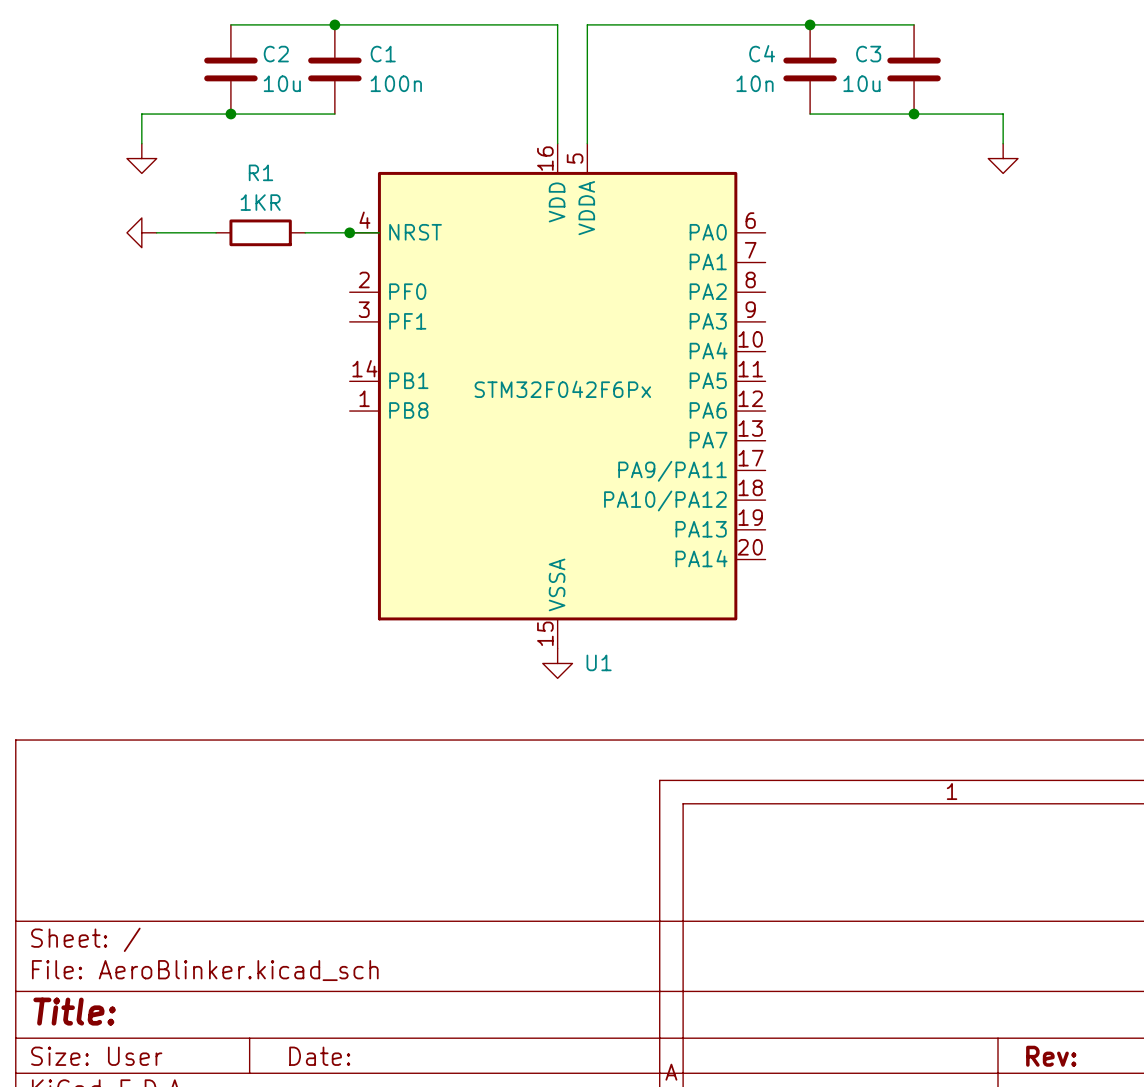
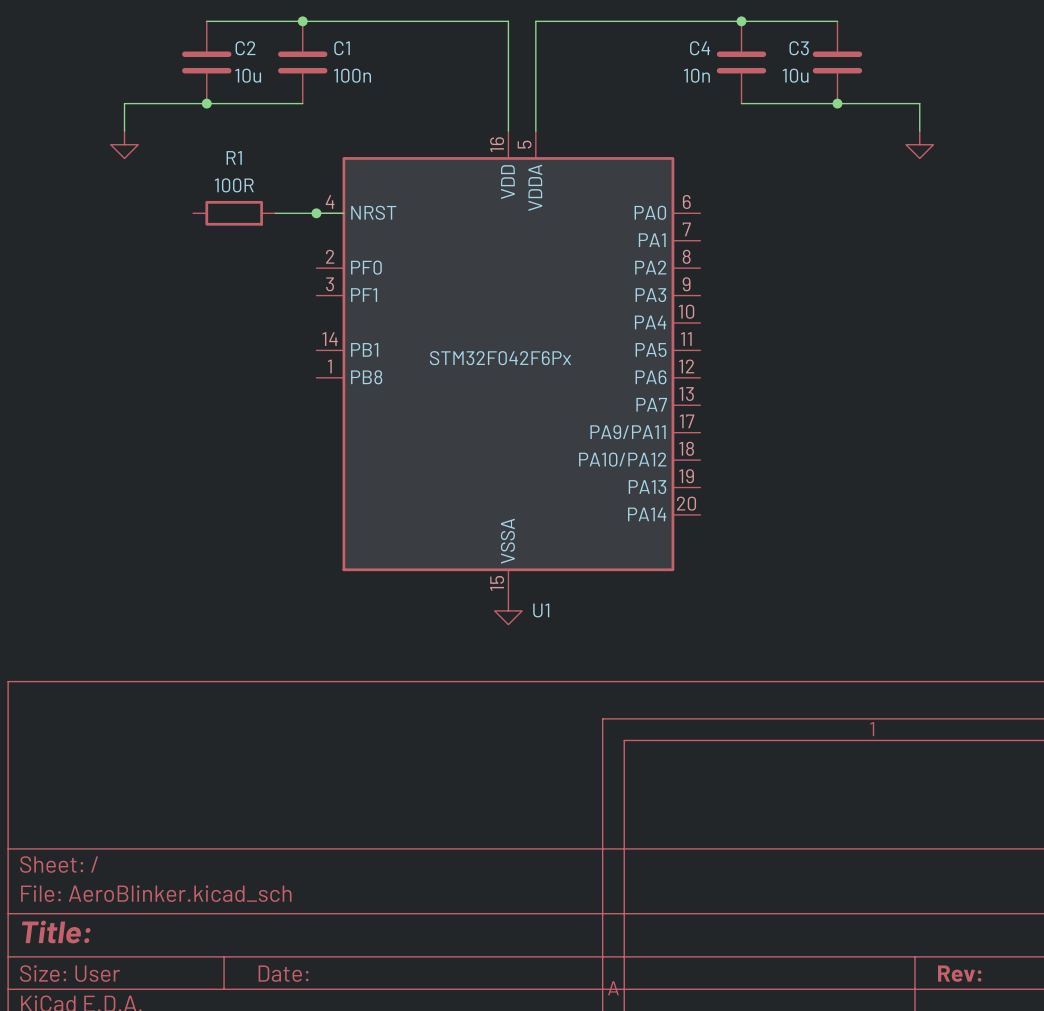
R1 value: 1KR (260, 202) -> 100R (234, 185)
power symbol: (141, 232) -> none
wire: (156, 232) (216, 232) -> none

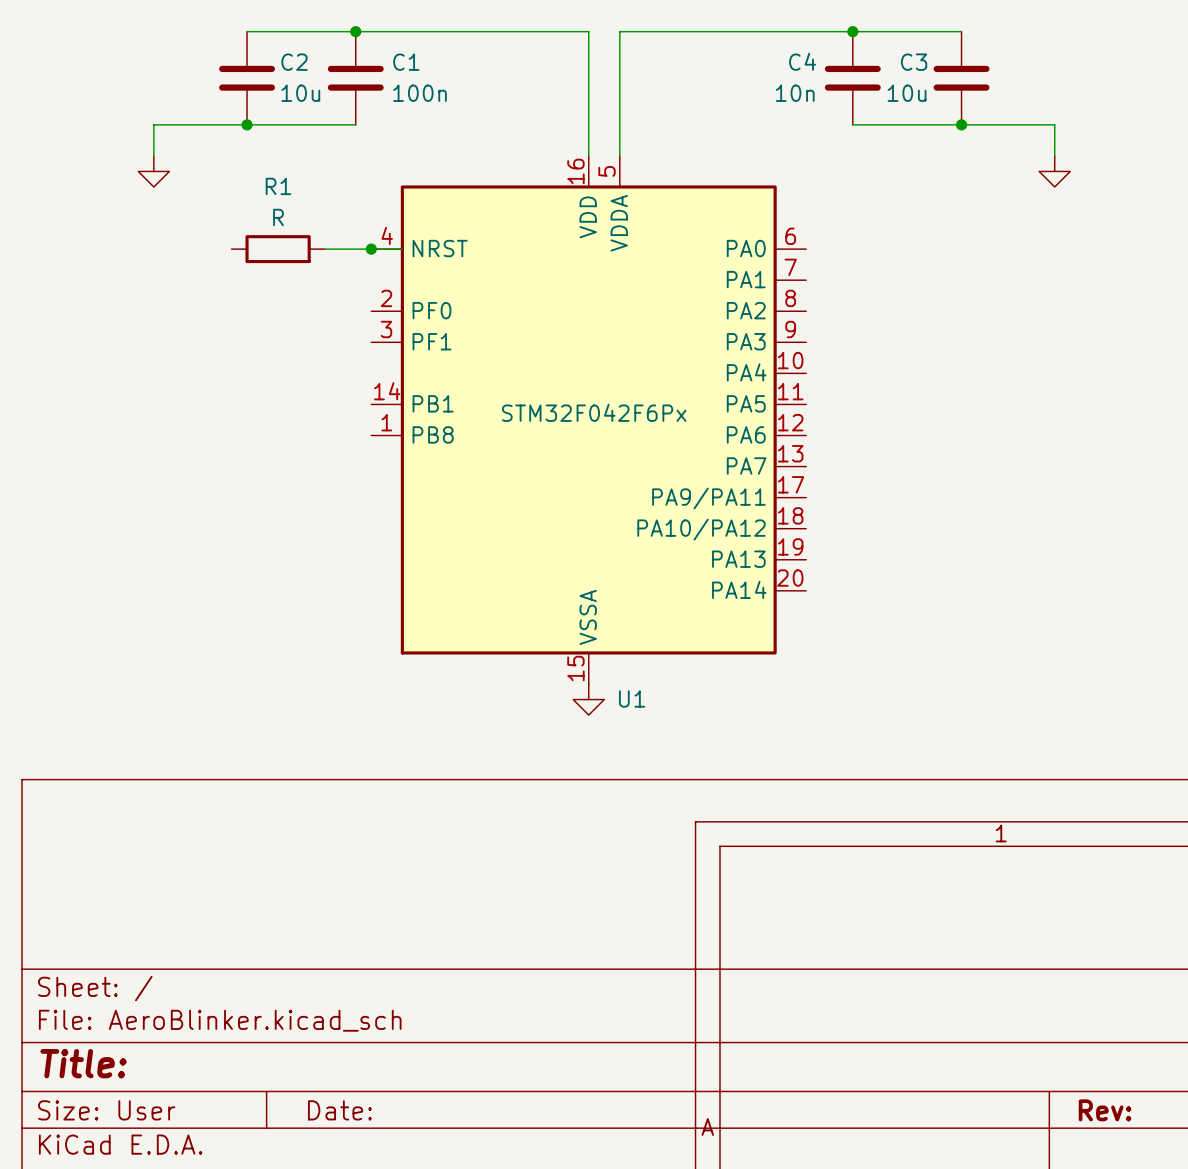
R1 value: 100R (234, 185) -> R (278, 217)

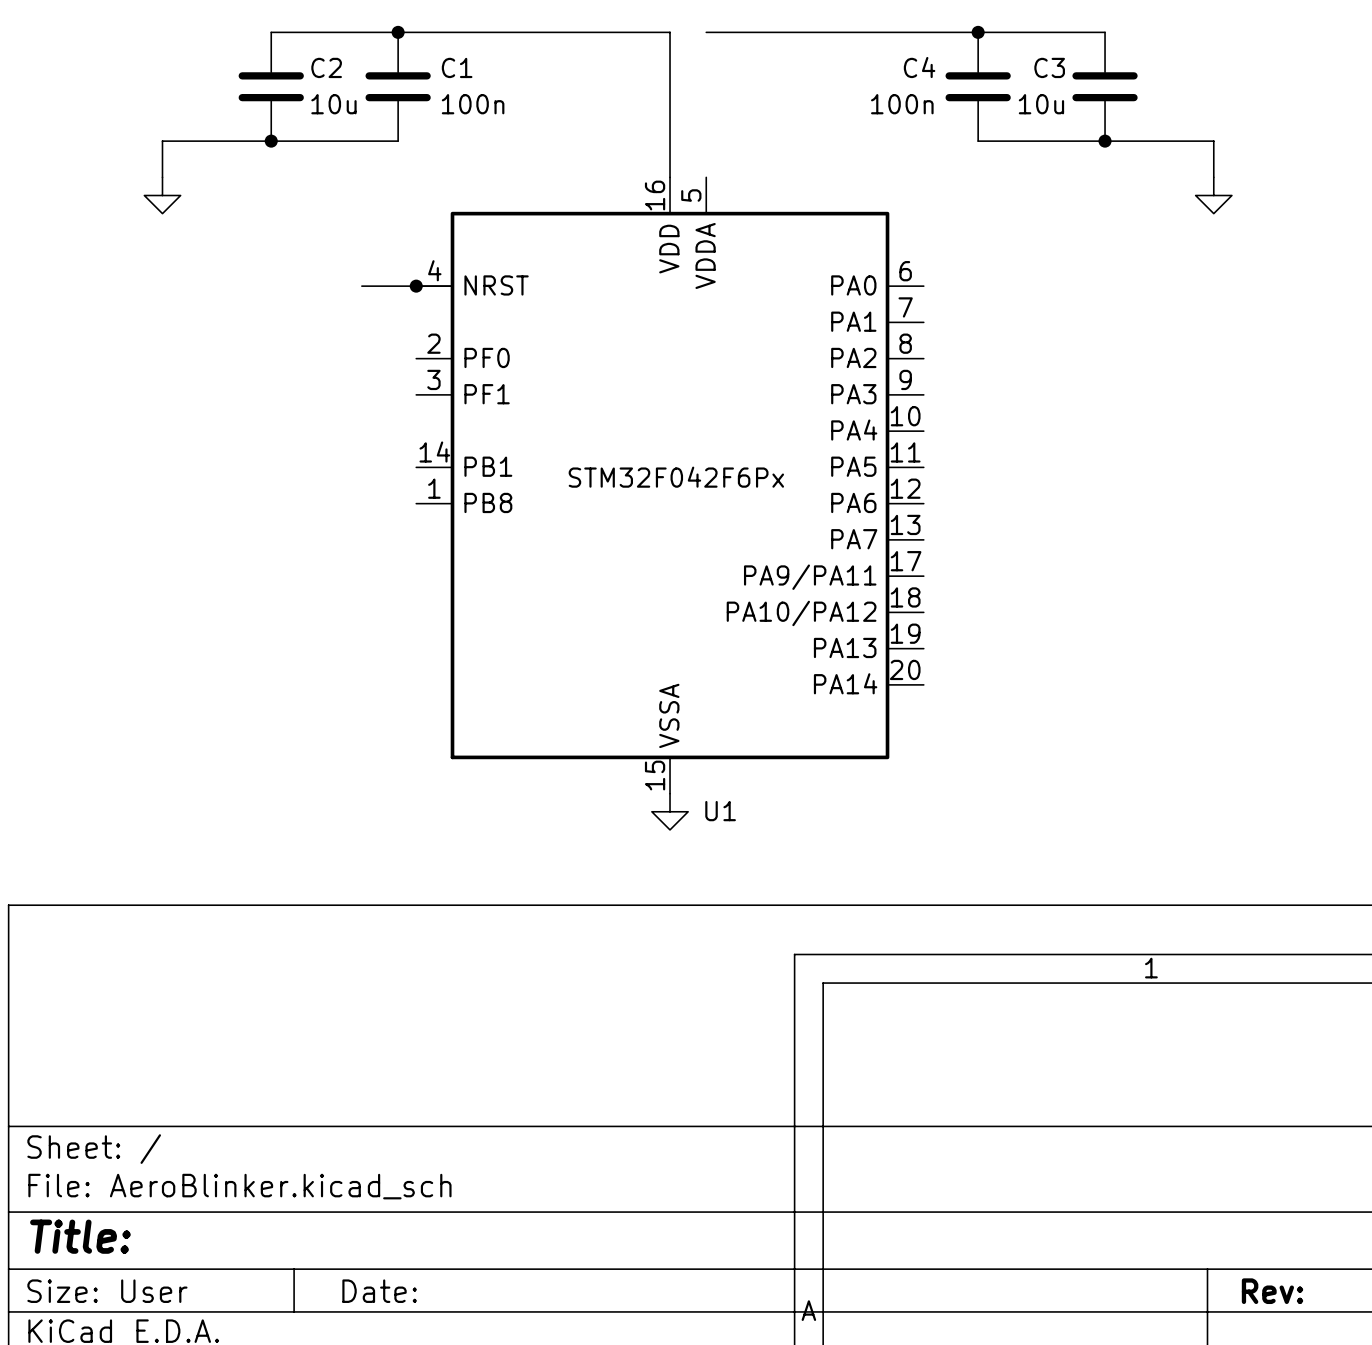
wire: (619, 31) (619, 155) -> none
C4 value: 10n (795, 93) -> 100n (902, 104)
R1: R (278, 249) -> none

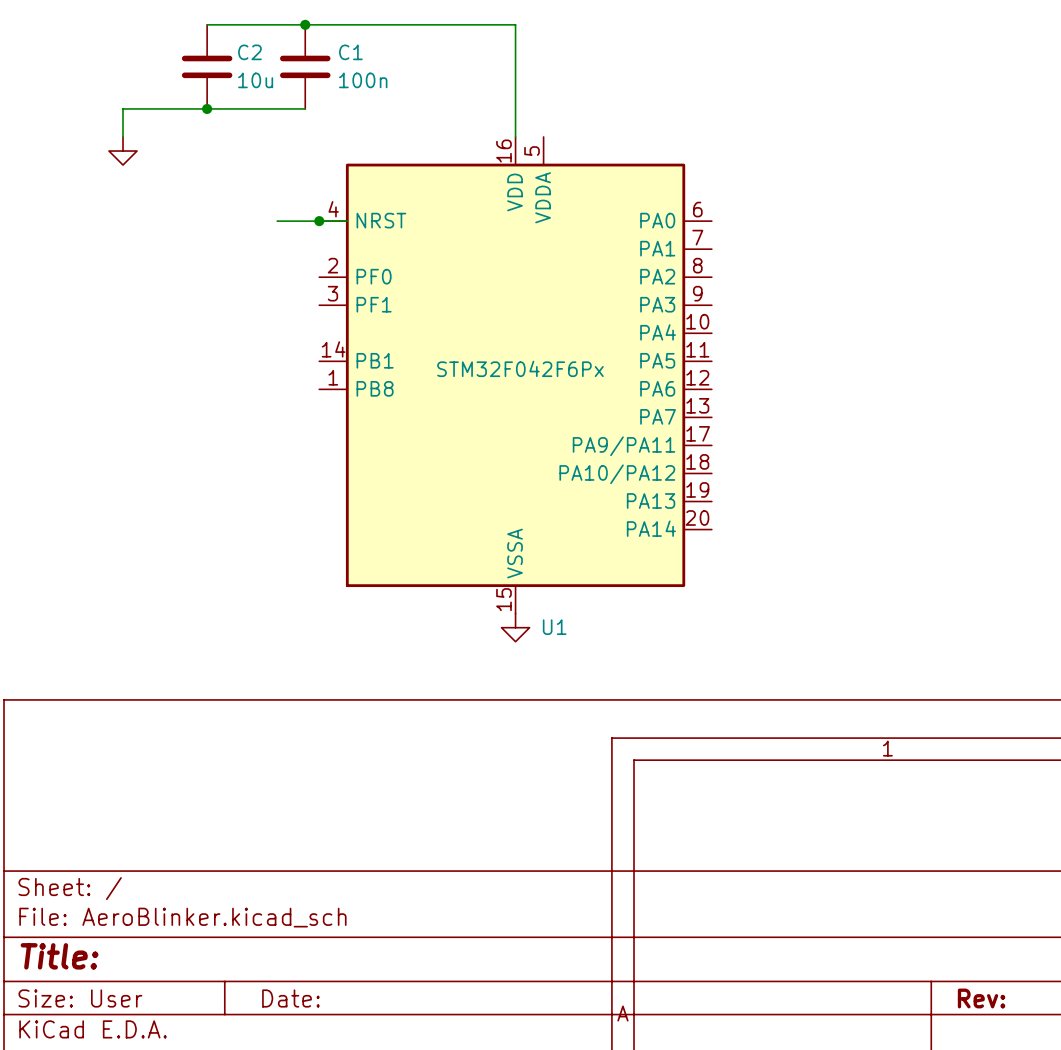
wire: (706, 32) (1105, 32) -> none
junction: (978, 32) -> none
C4: 100n (978, 86) -> none
C3: 10u (1105, 86) -> none
wire: (978, 141) (1213, 141) (1213, 177) -> none
junction: (1105, 141) -> none
power symbol: (1213, 195) -> none

